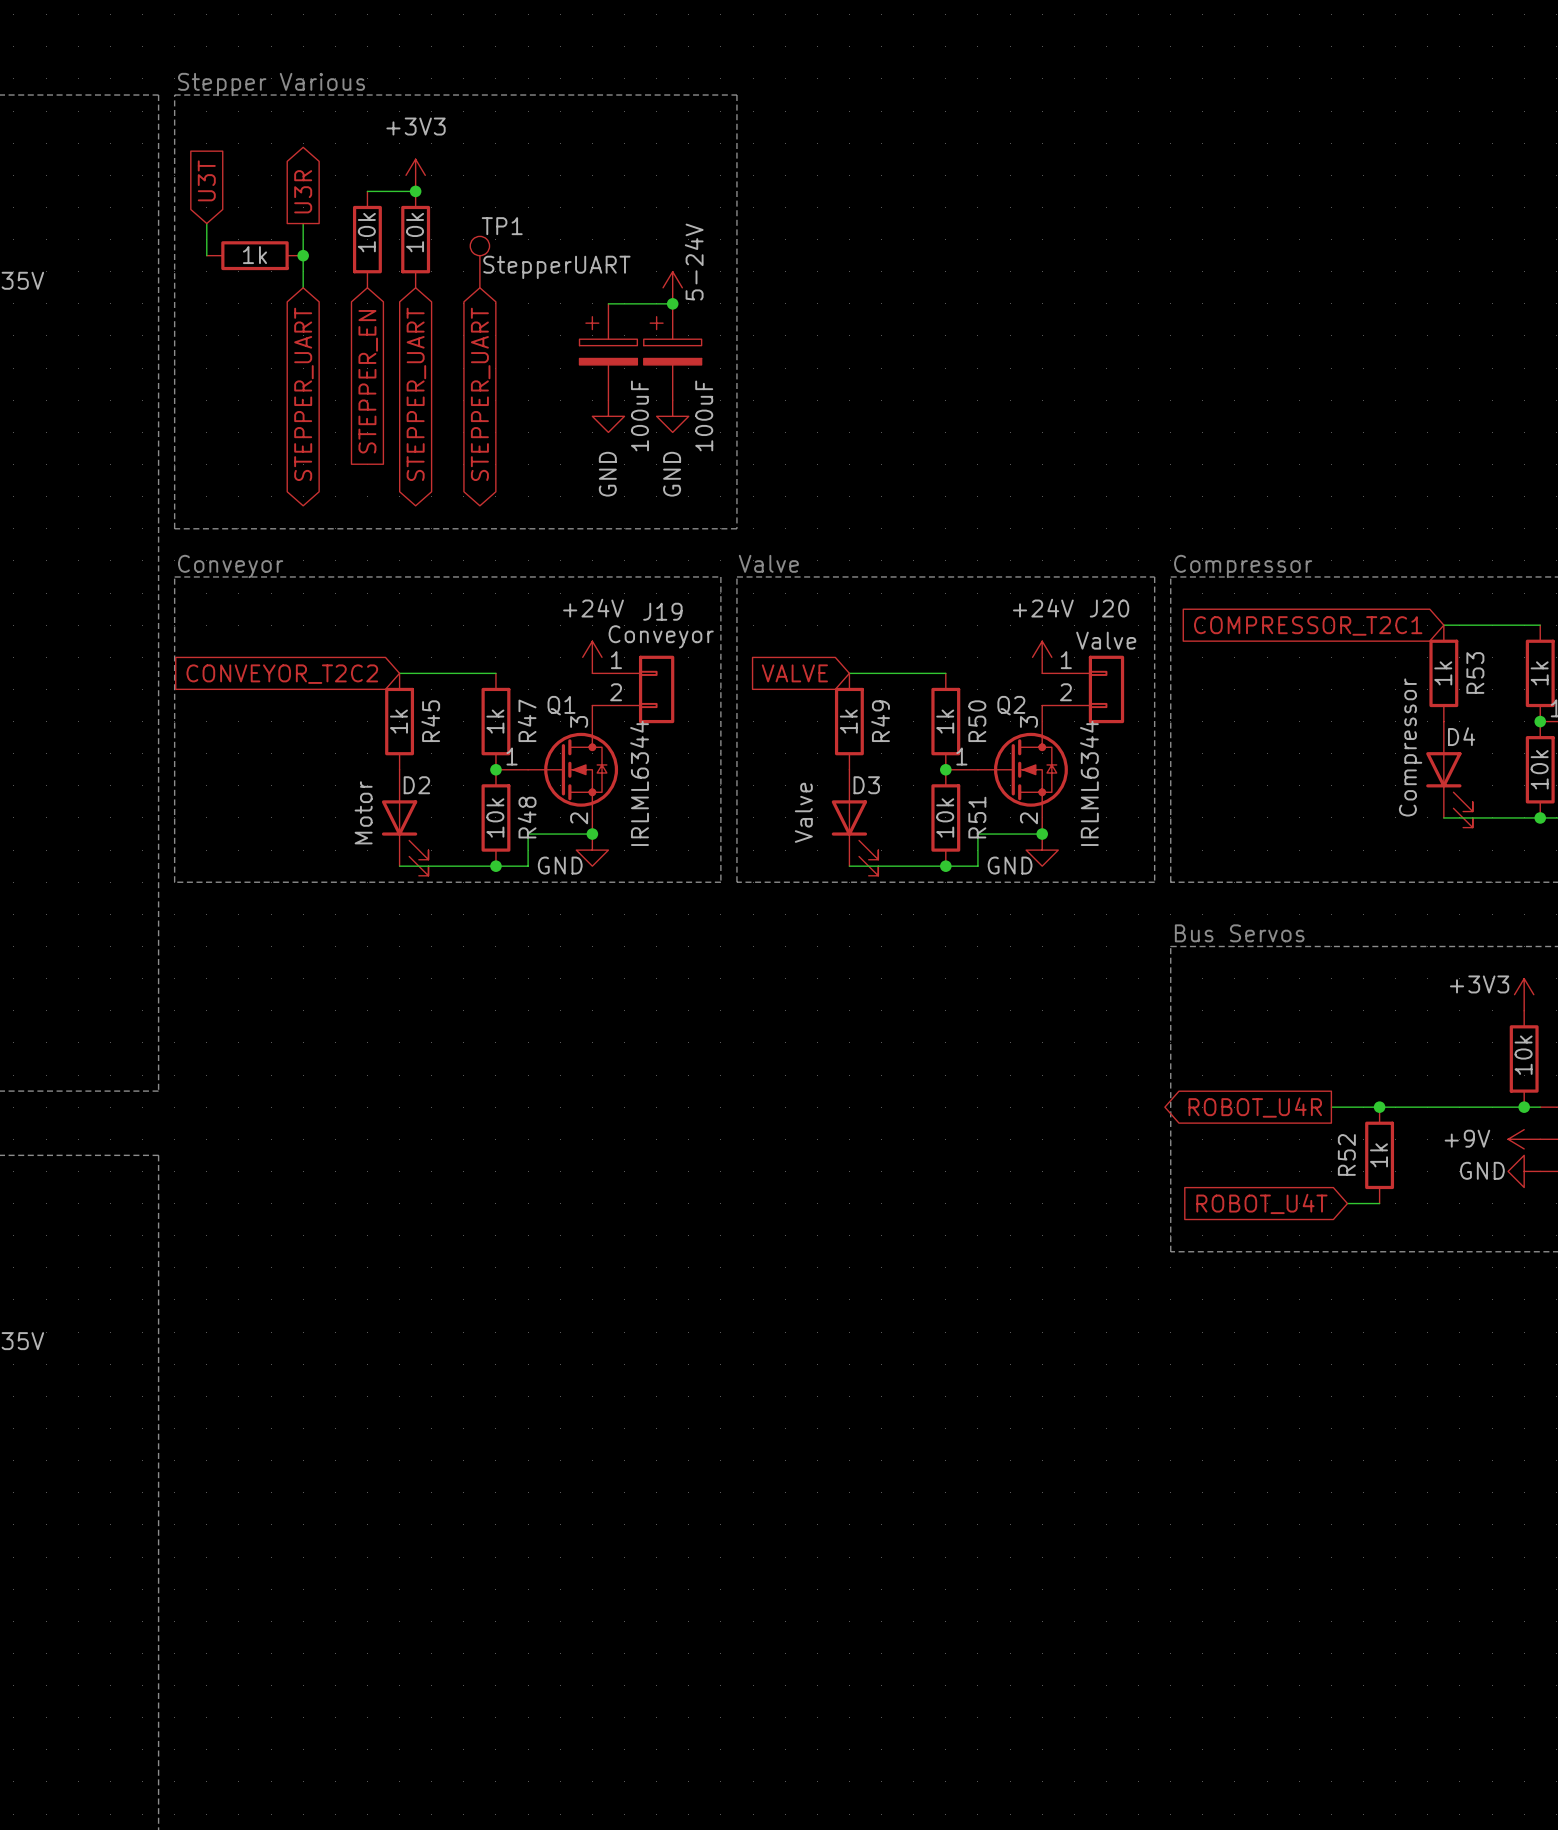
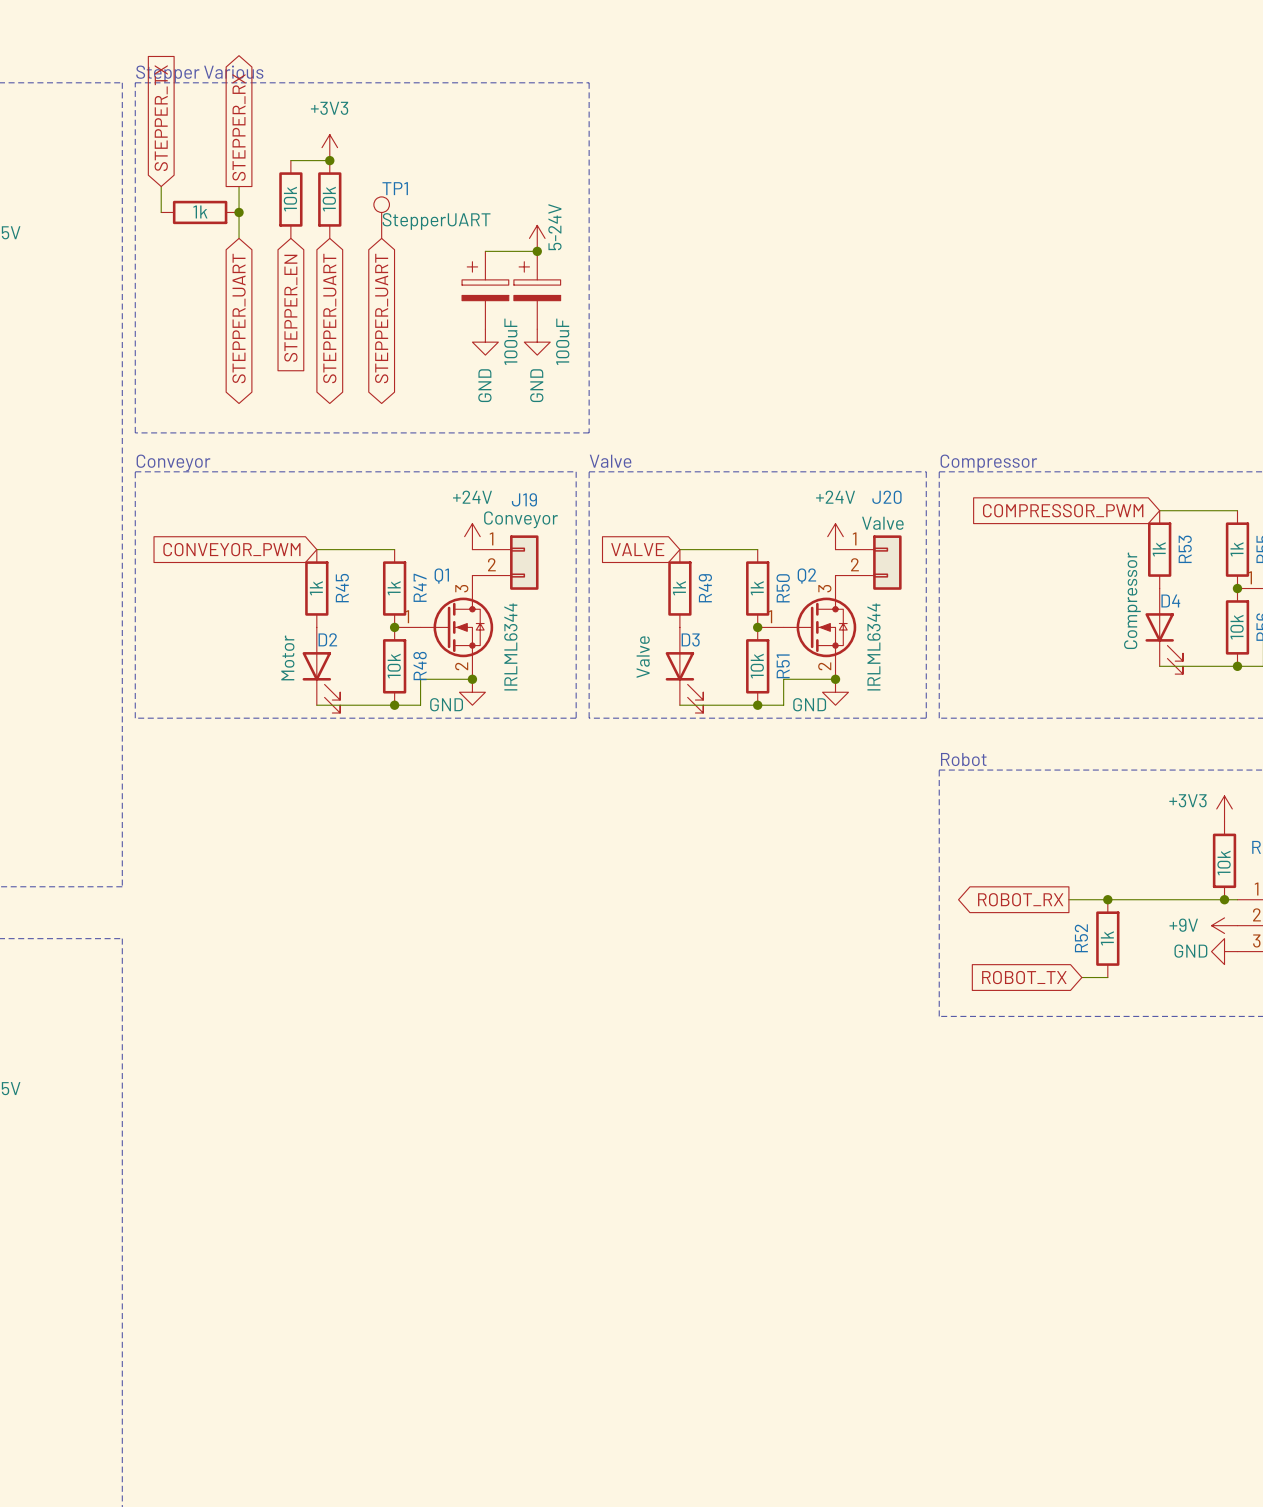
global label: U3T (206, 180) -> STEPPER_TX (161, 118)
global label: U3R (303, 191) -> STEPPER_RX (239, 127)
global label: COMPRESSOR_T2C1 (1308, 625) -> COMPRESSOR_PWM (1063, 510)
global label: CONVEYOR_T2C2 (282, 674) -> CONVEYOR_PWM (231, 549)
text: Bus Servos (1239, 933) -> Robot (963, 759)
global label: ROBOT_U4R (1255, 1107) -> ROBOT_RX (1020, 899)
global label: ROBOT_U4T (1261, 1203) -> ROBOT_TX (1024, 977)

